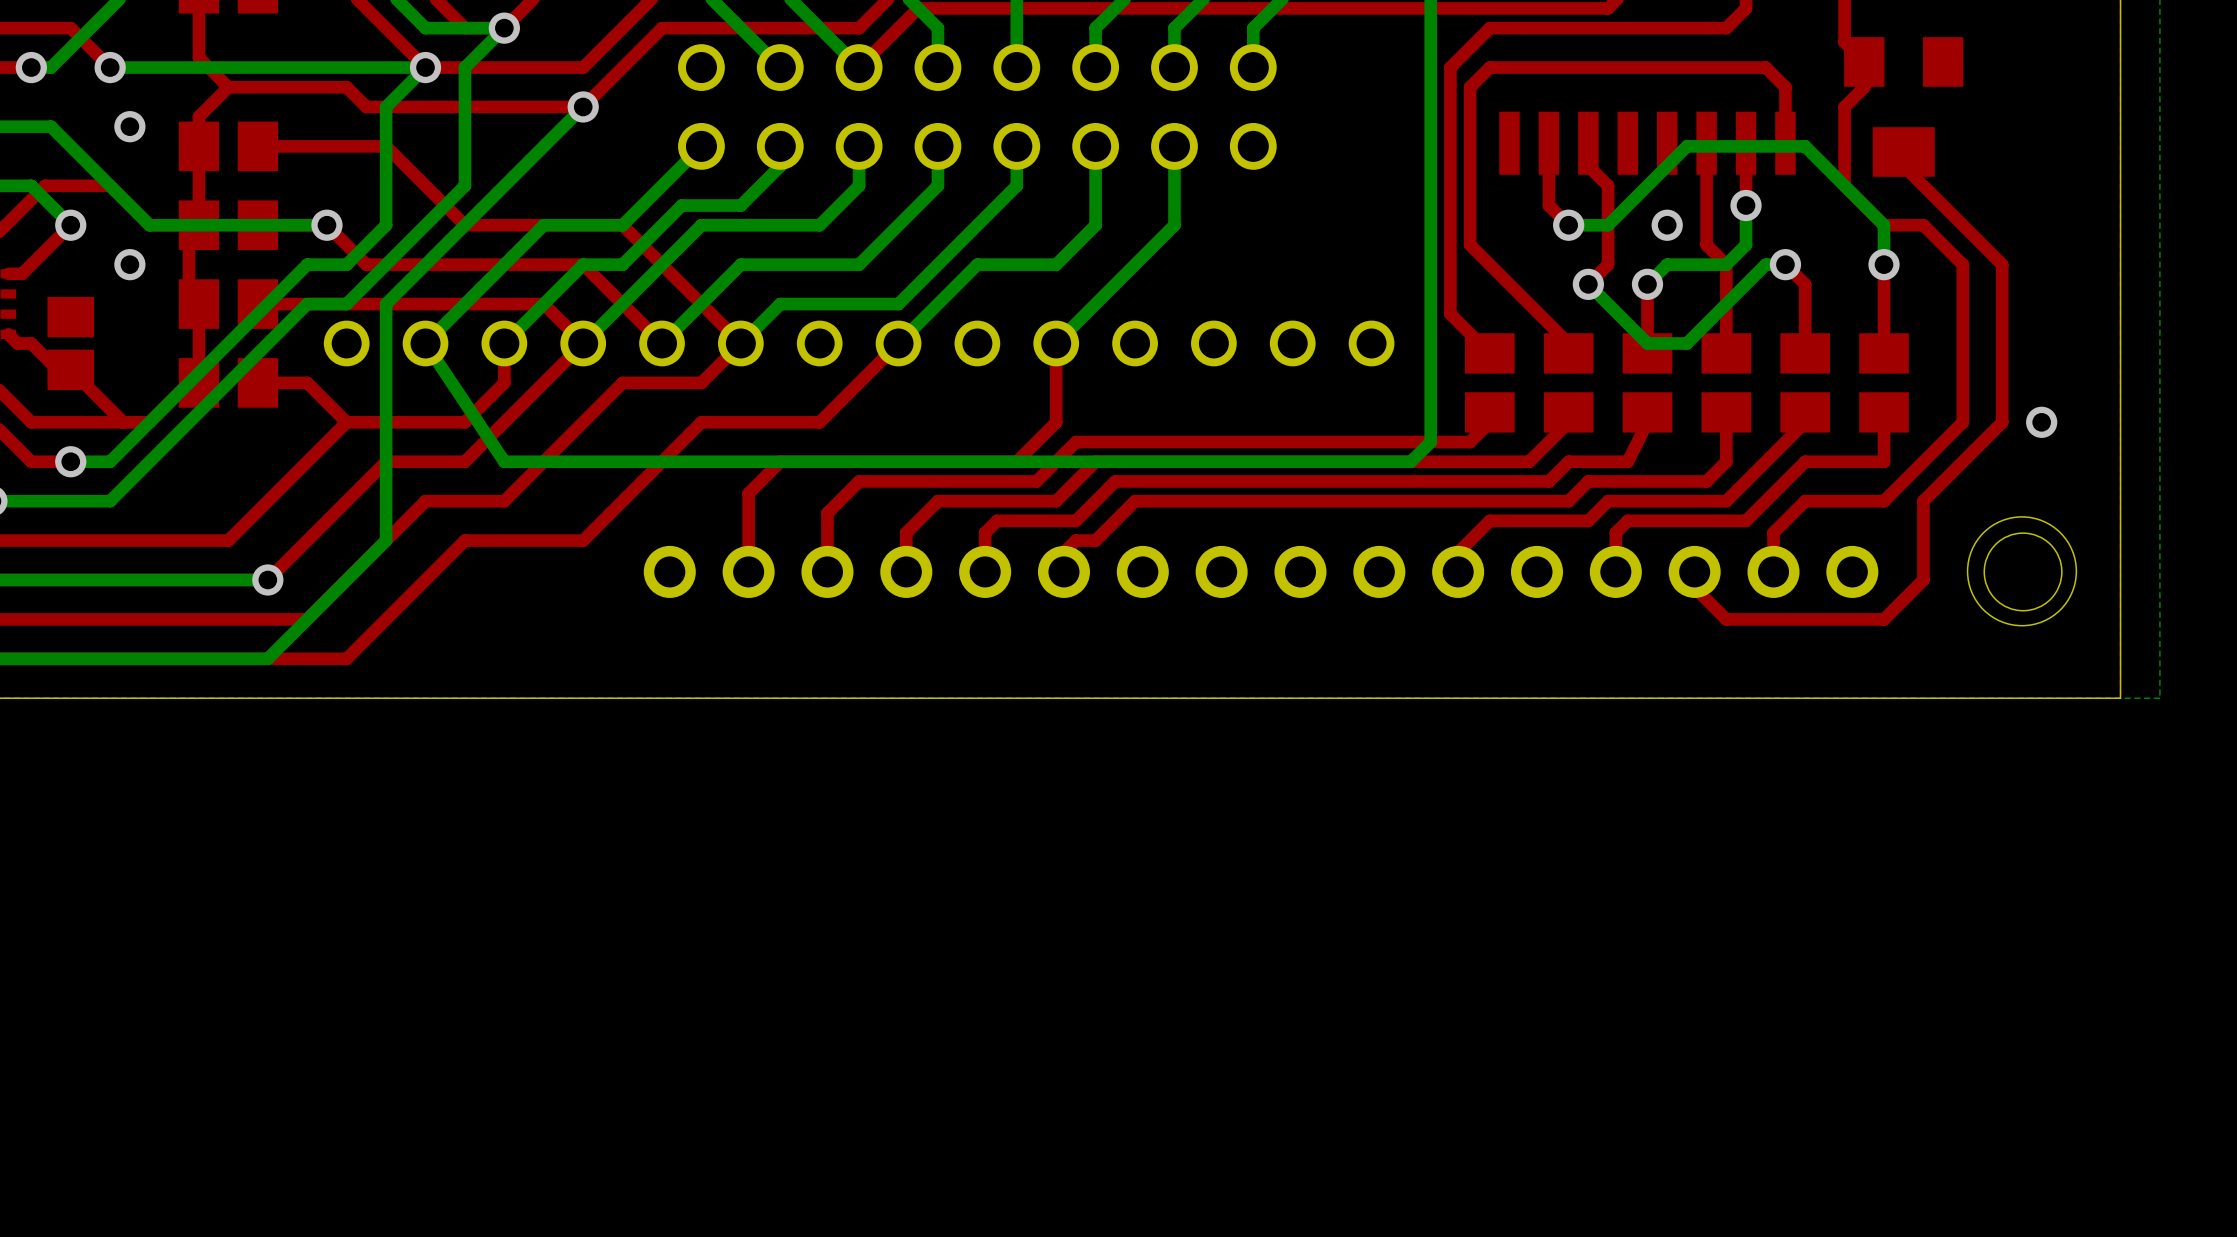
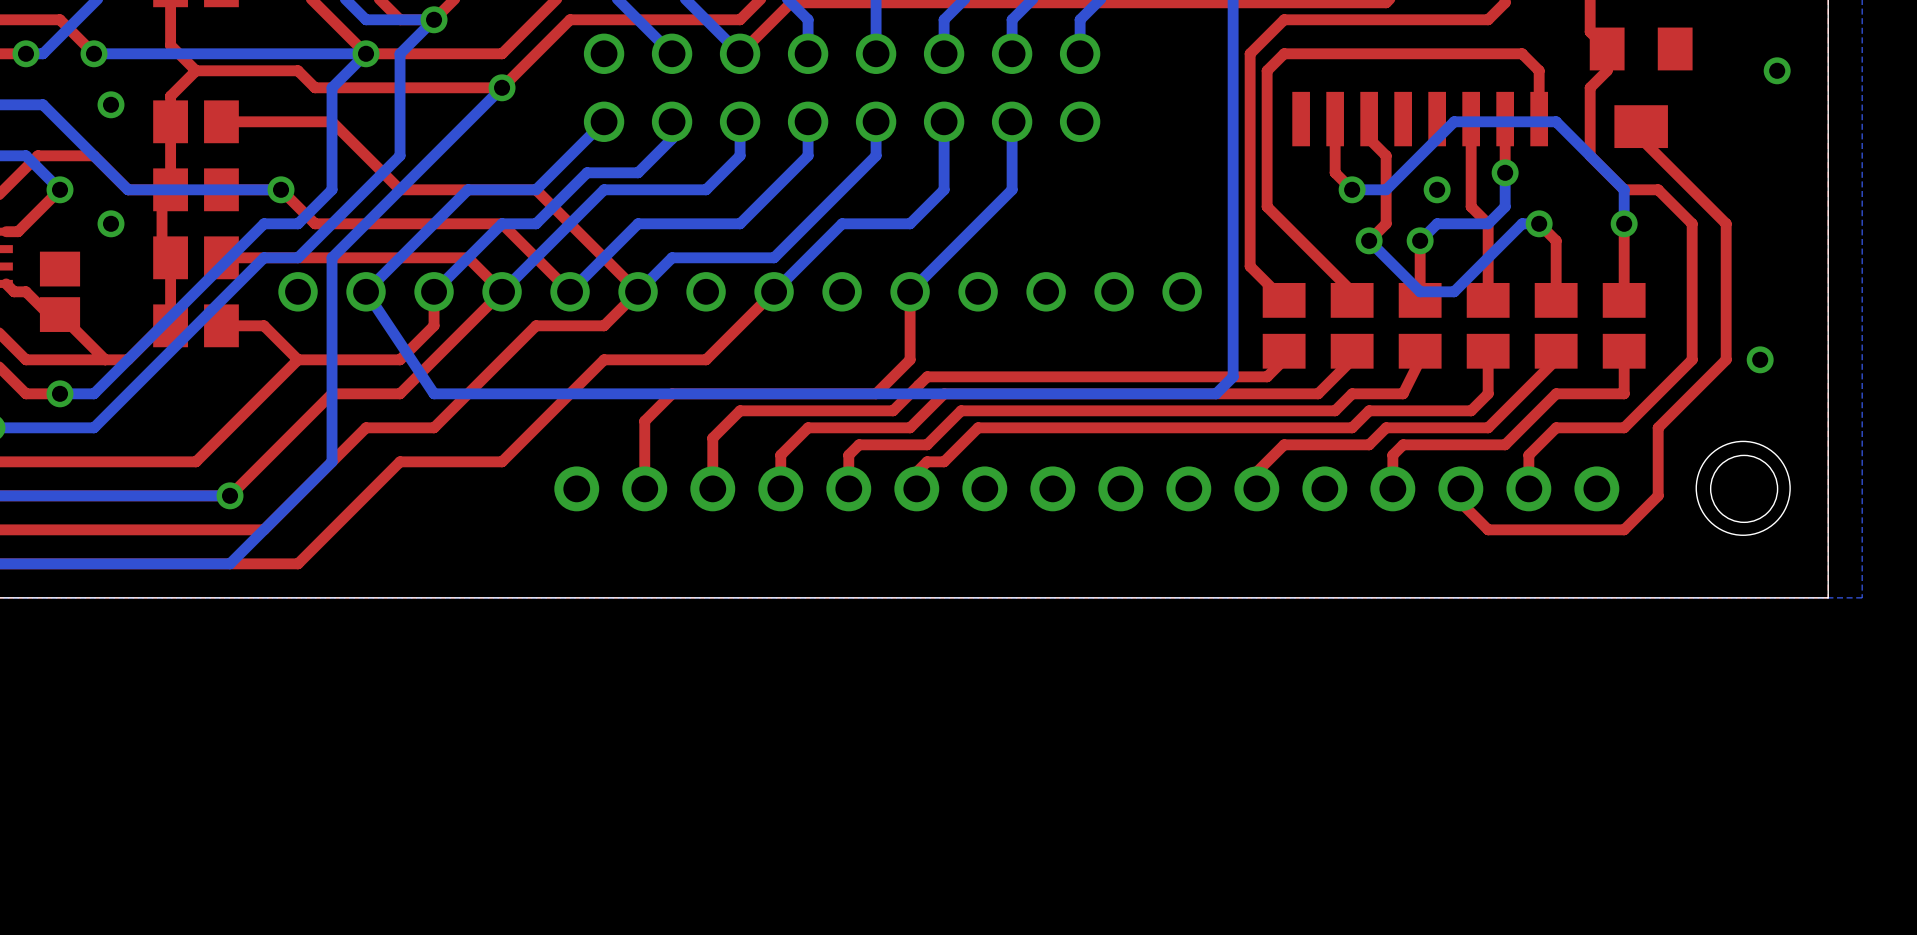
via: none -> (1777, 70)

